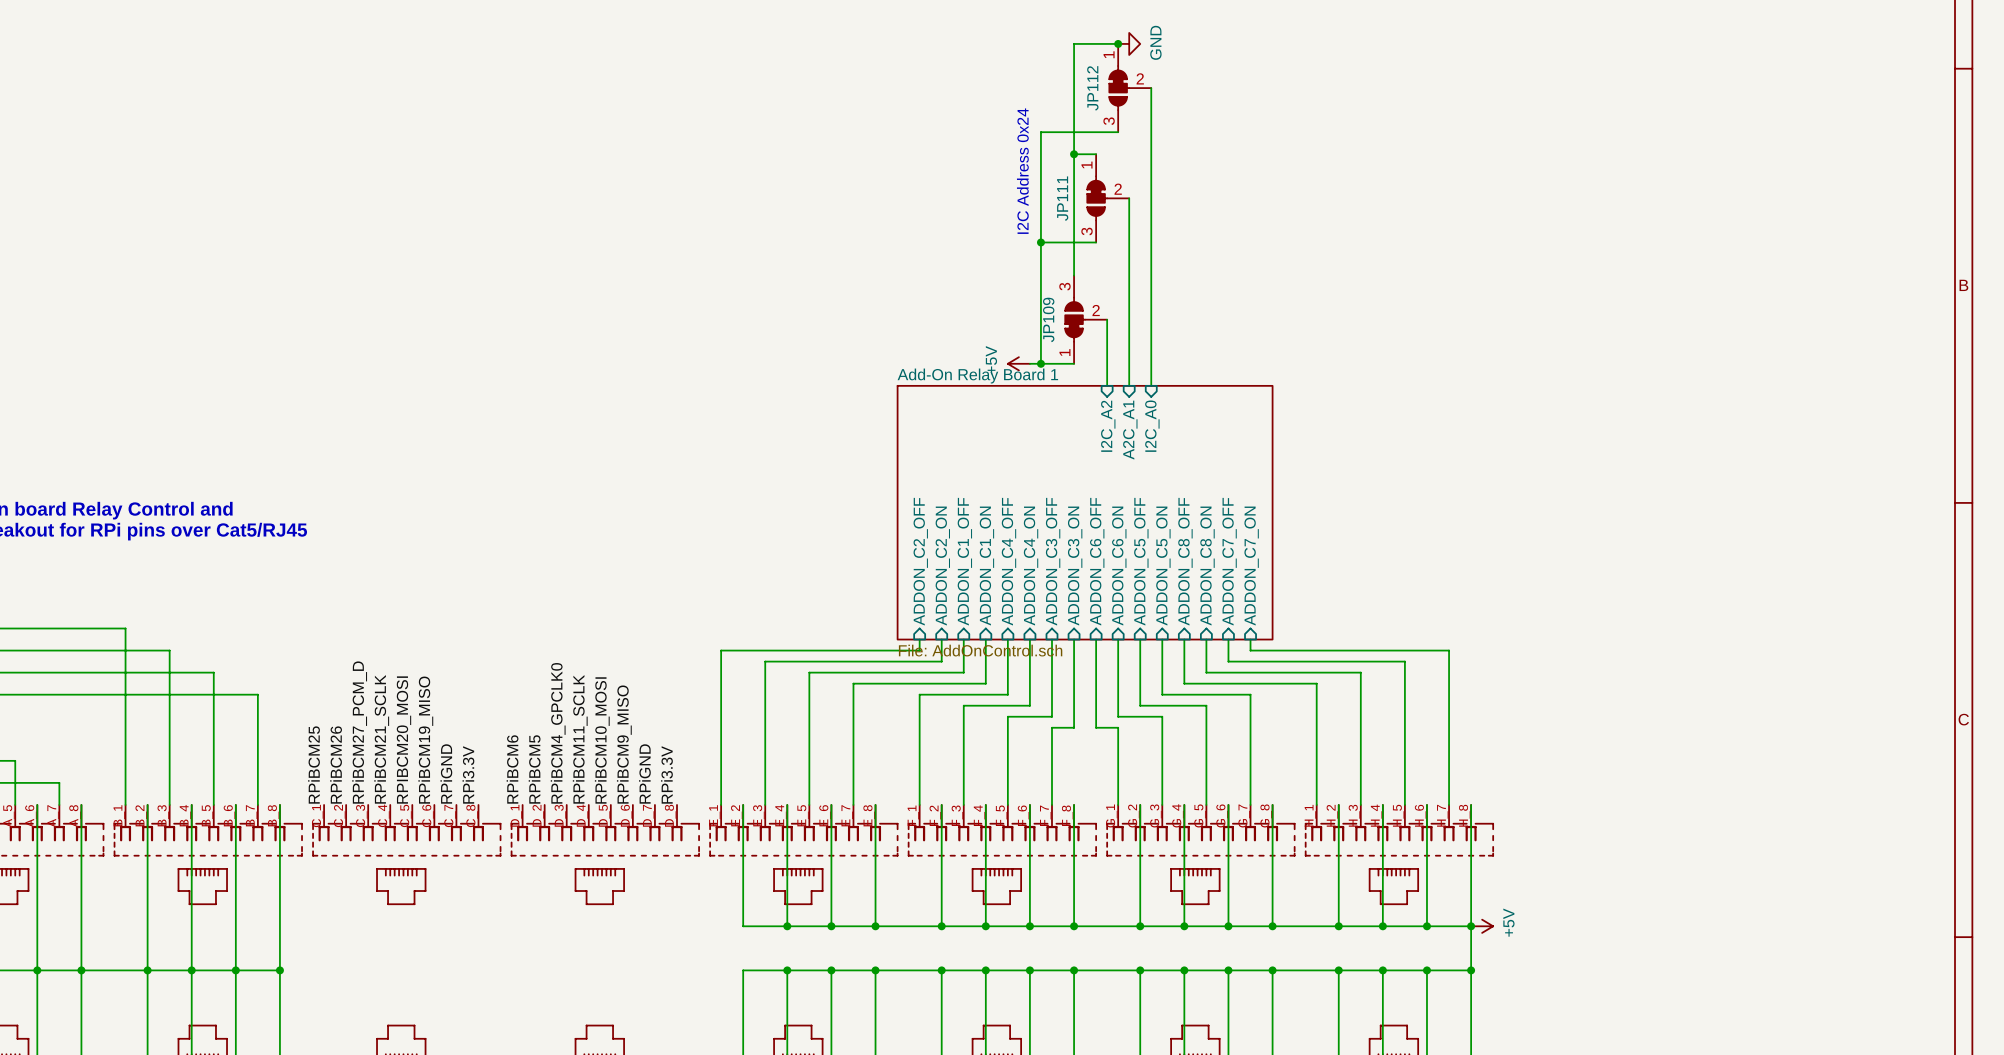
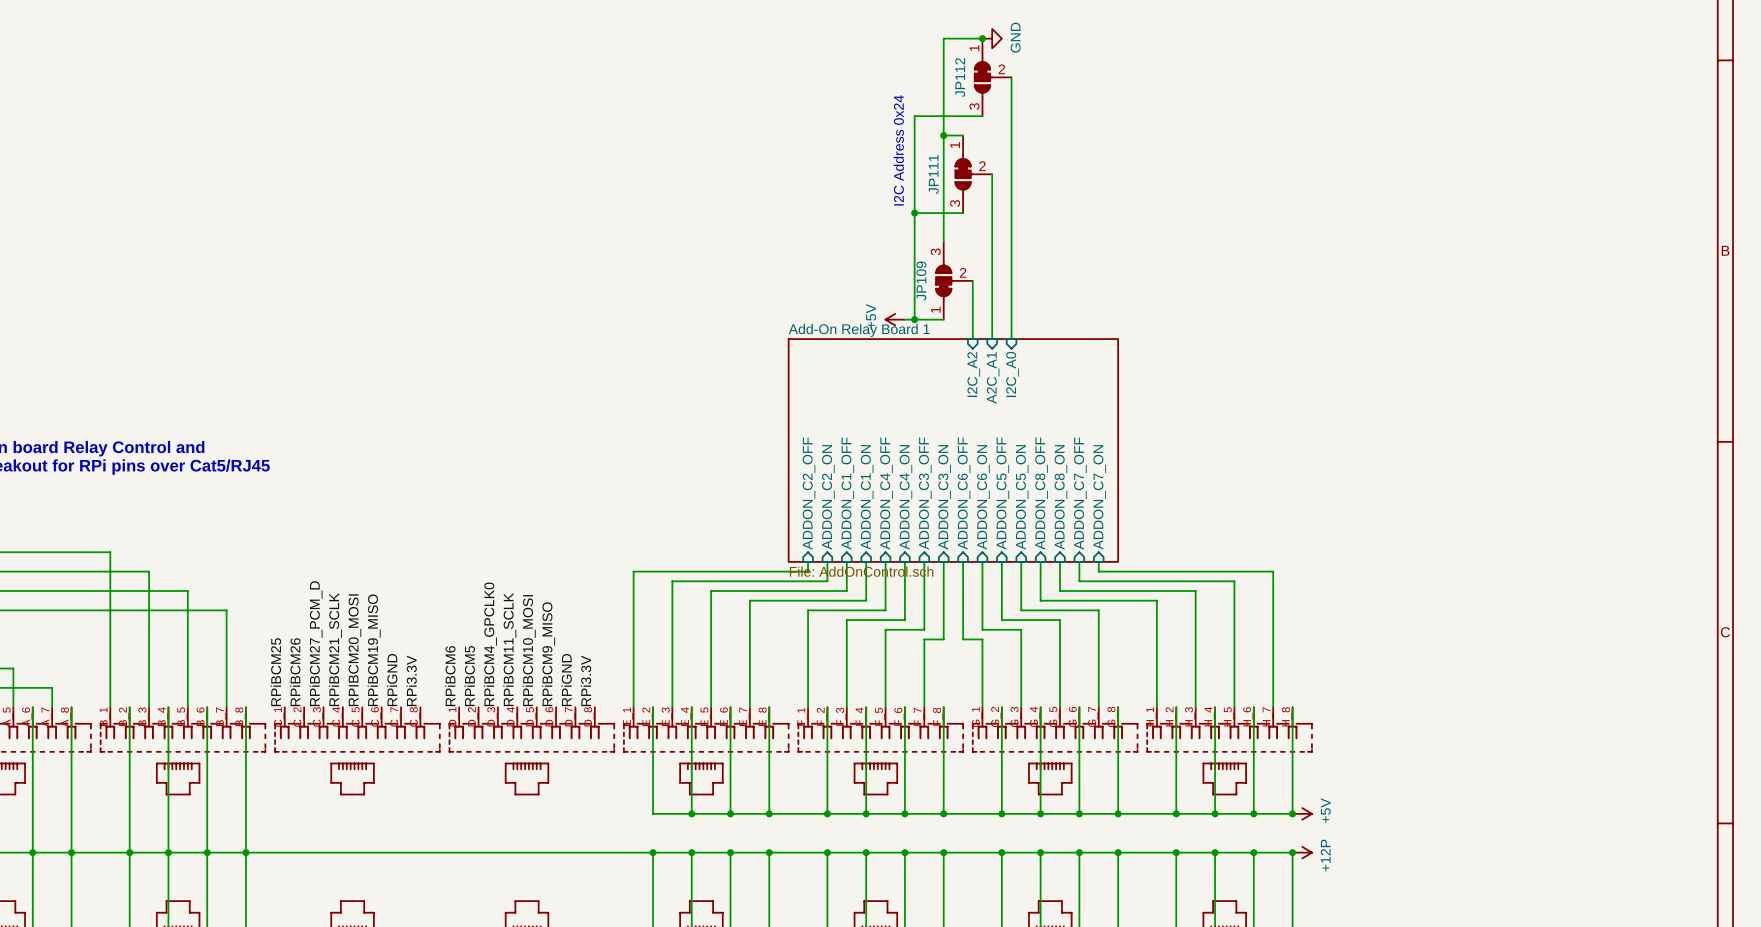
wire: (1471, 926) (1471, 970) -> none
wire: none -> (245, 852) (652, 852)
junction: none -> (652, 852)
power symbol: none -> +12P (1302, 852)

